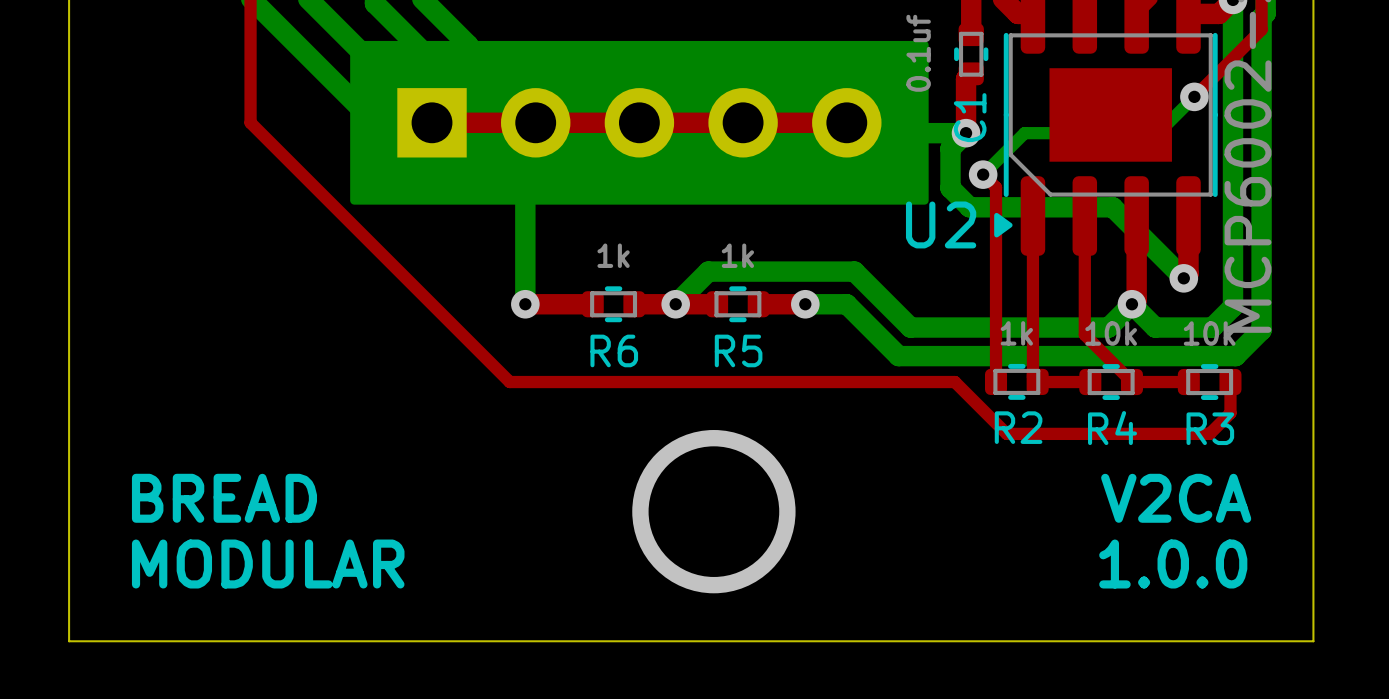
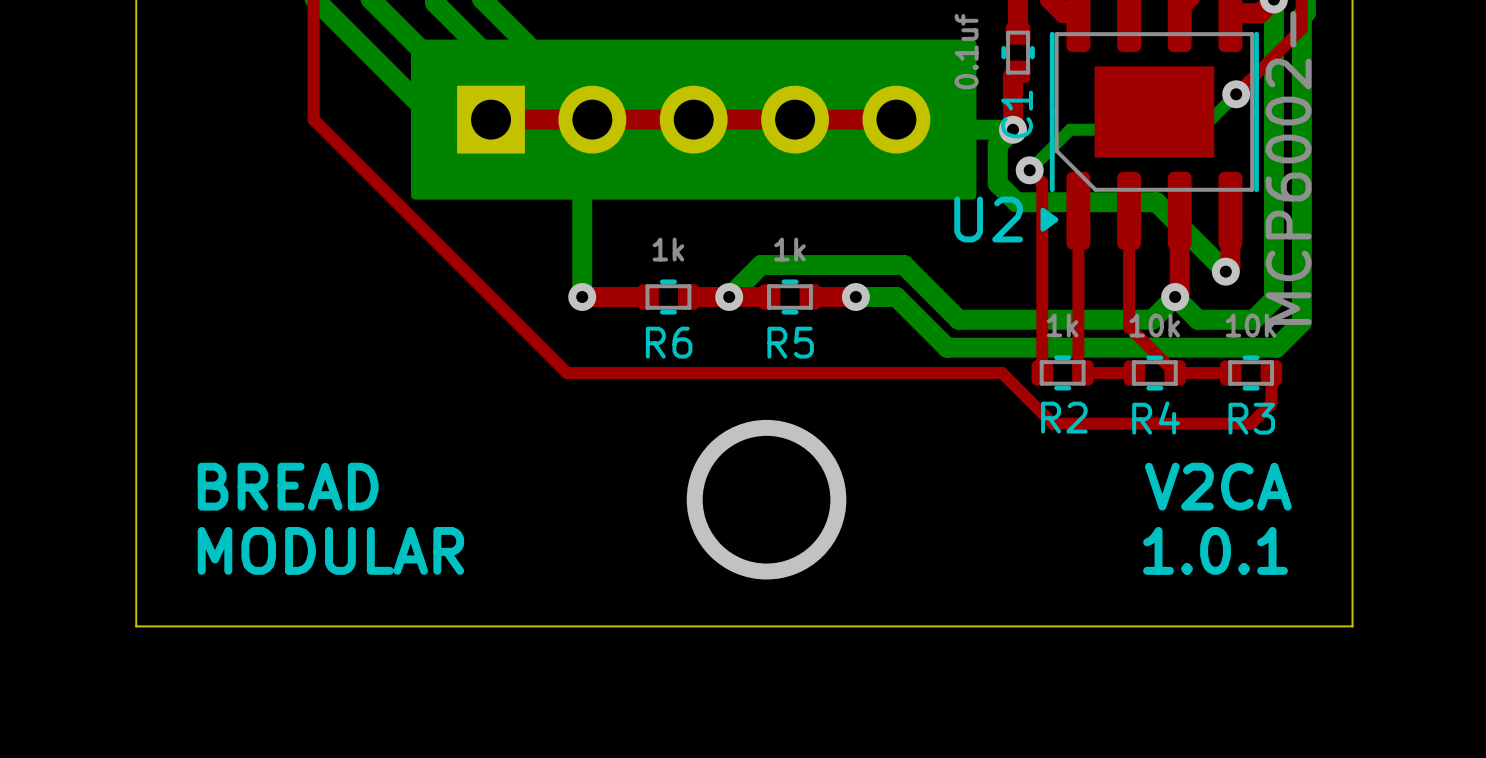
text: 1.0.0 (1173, 564) -> 1.0.1 (1215, 550)

